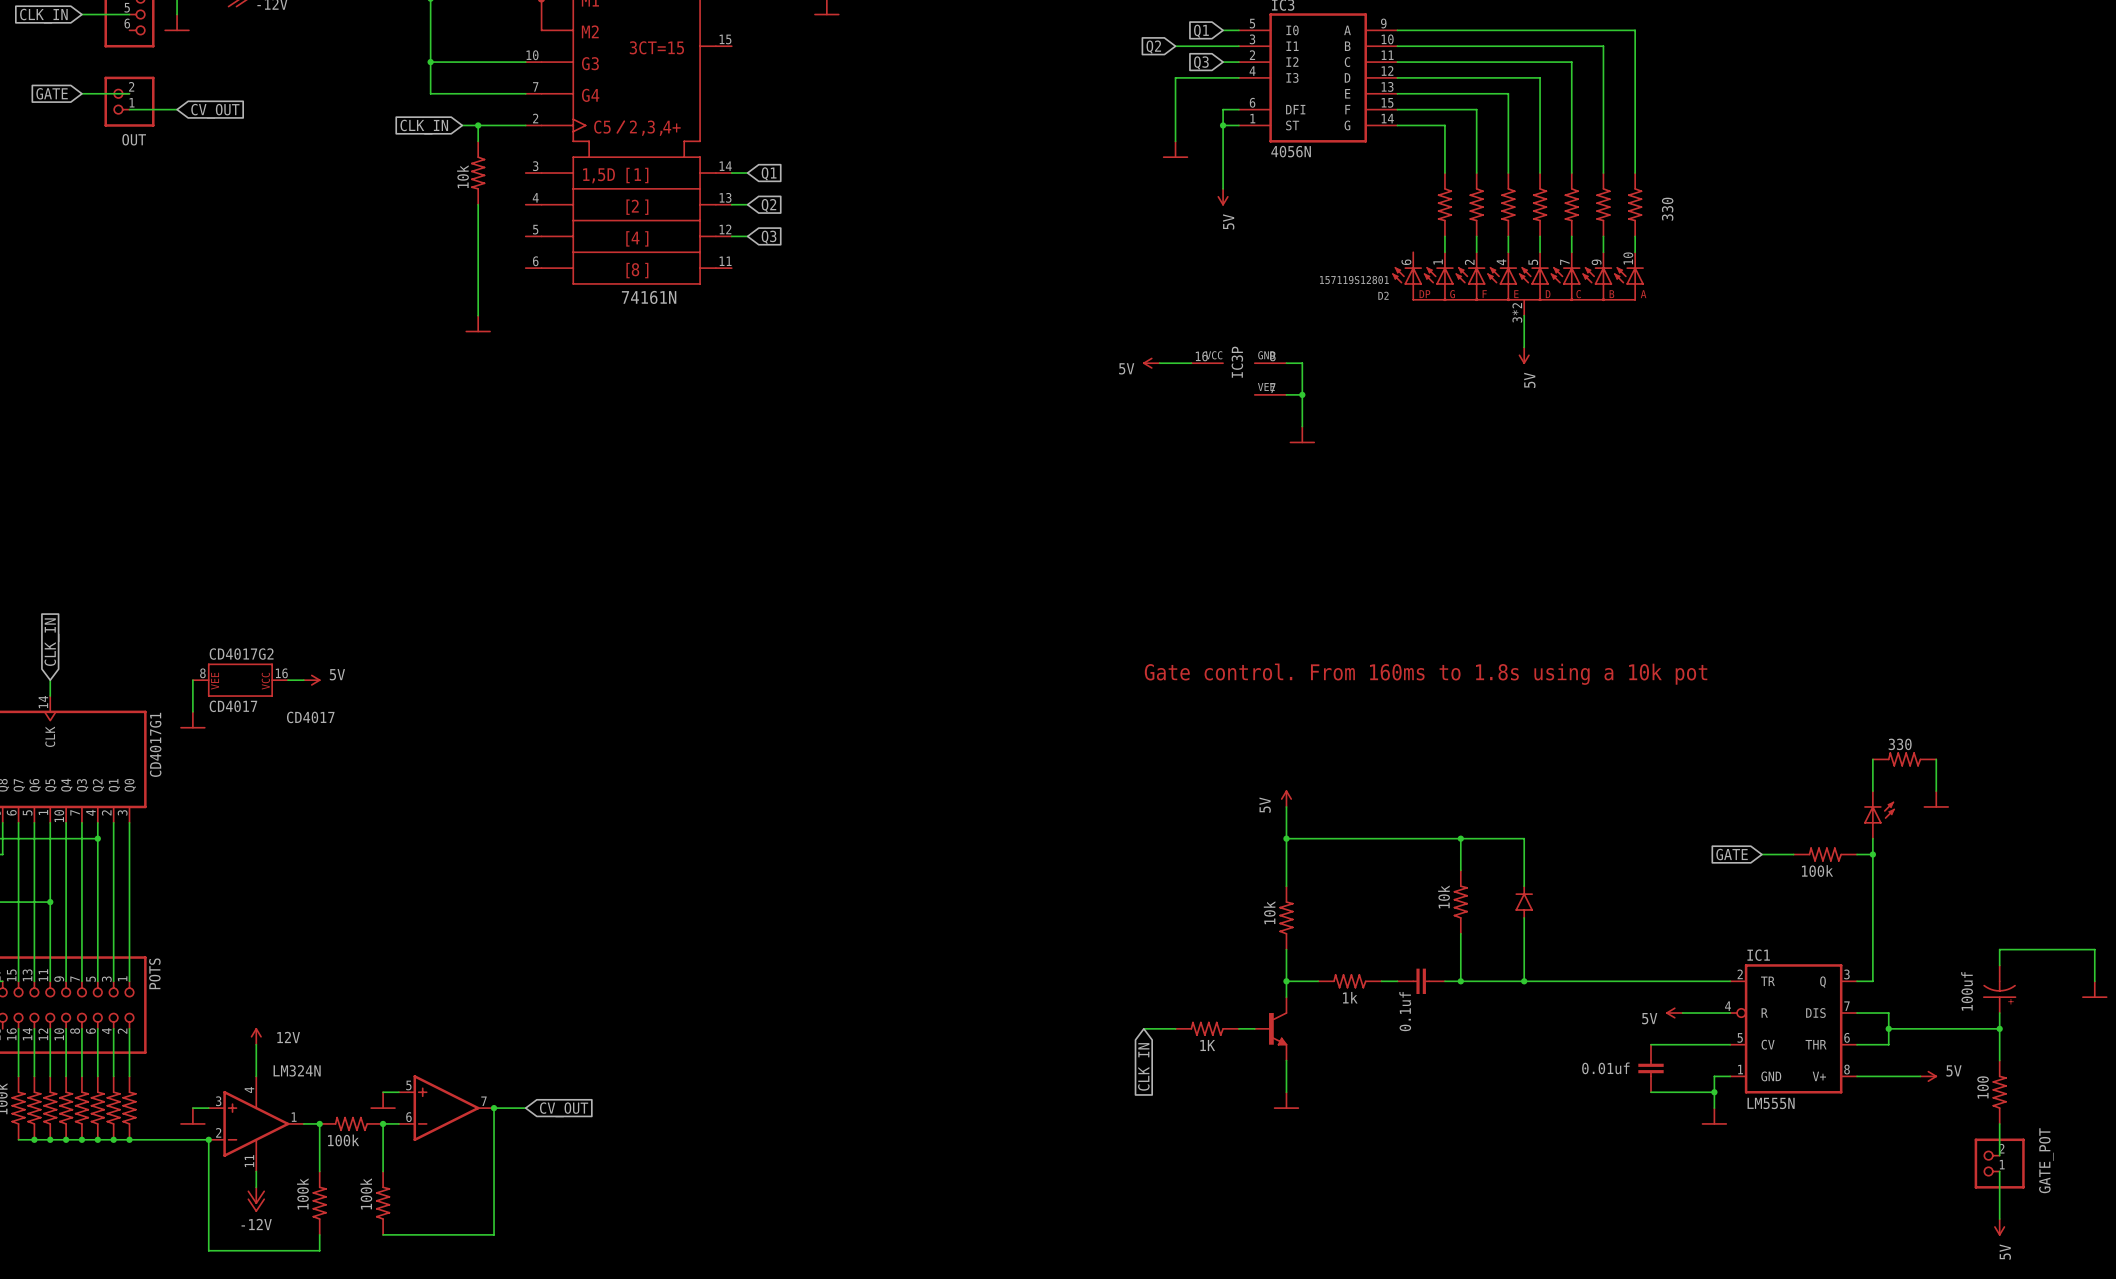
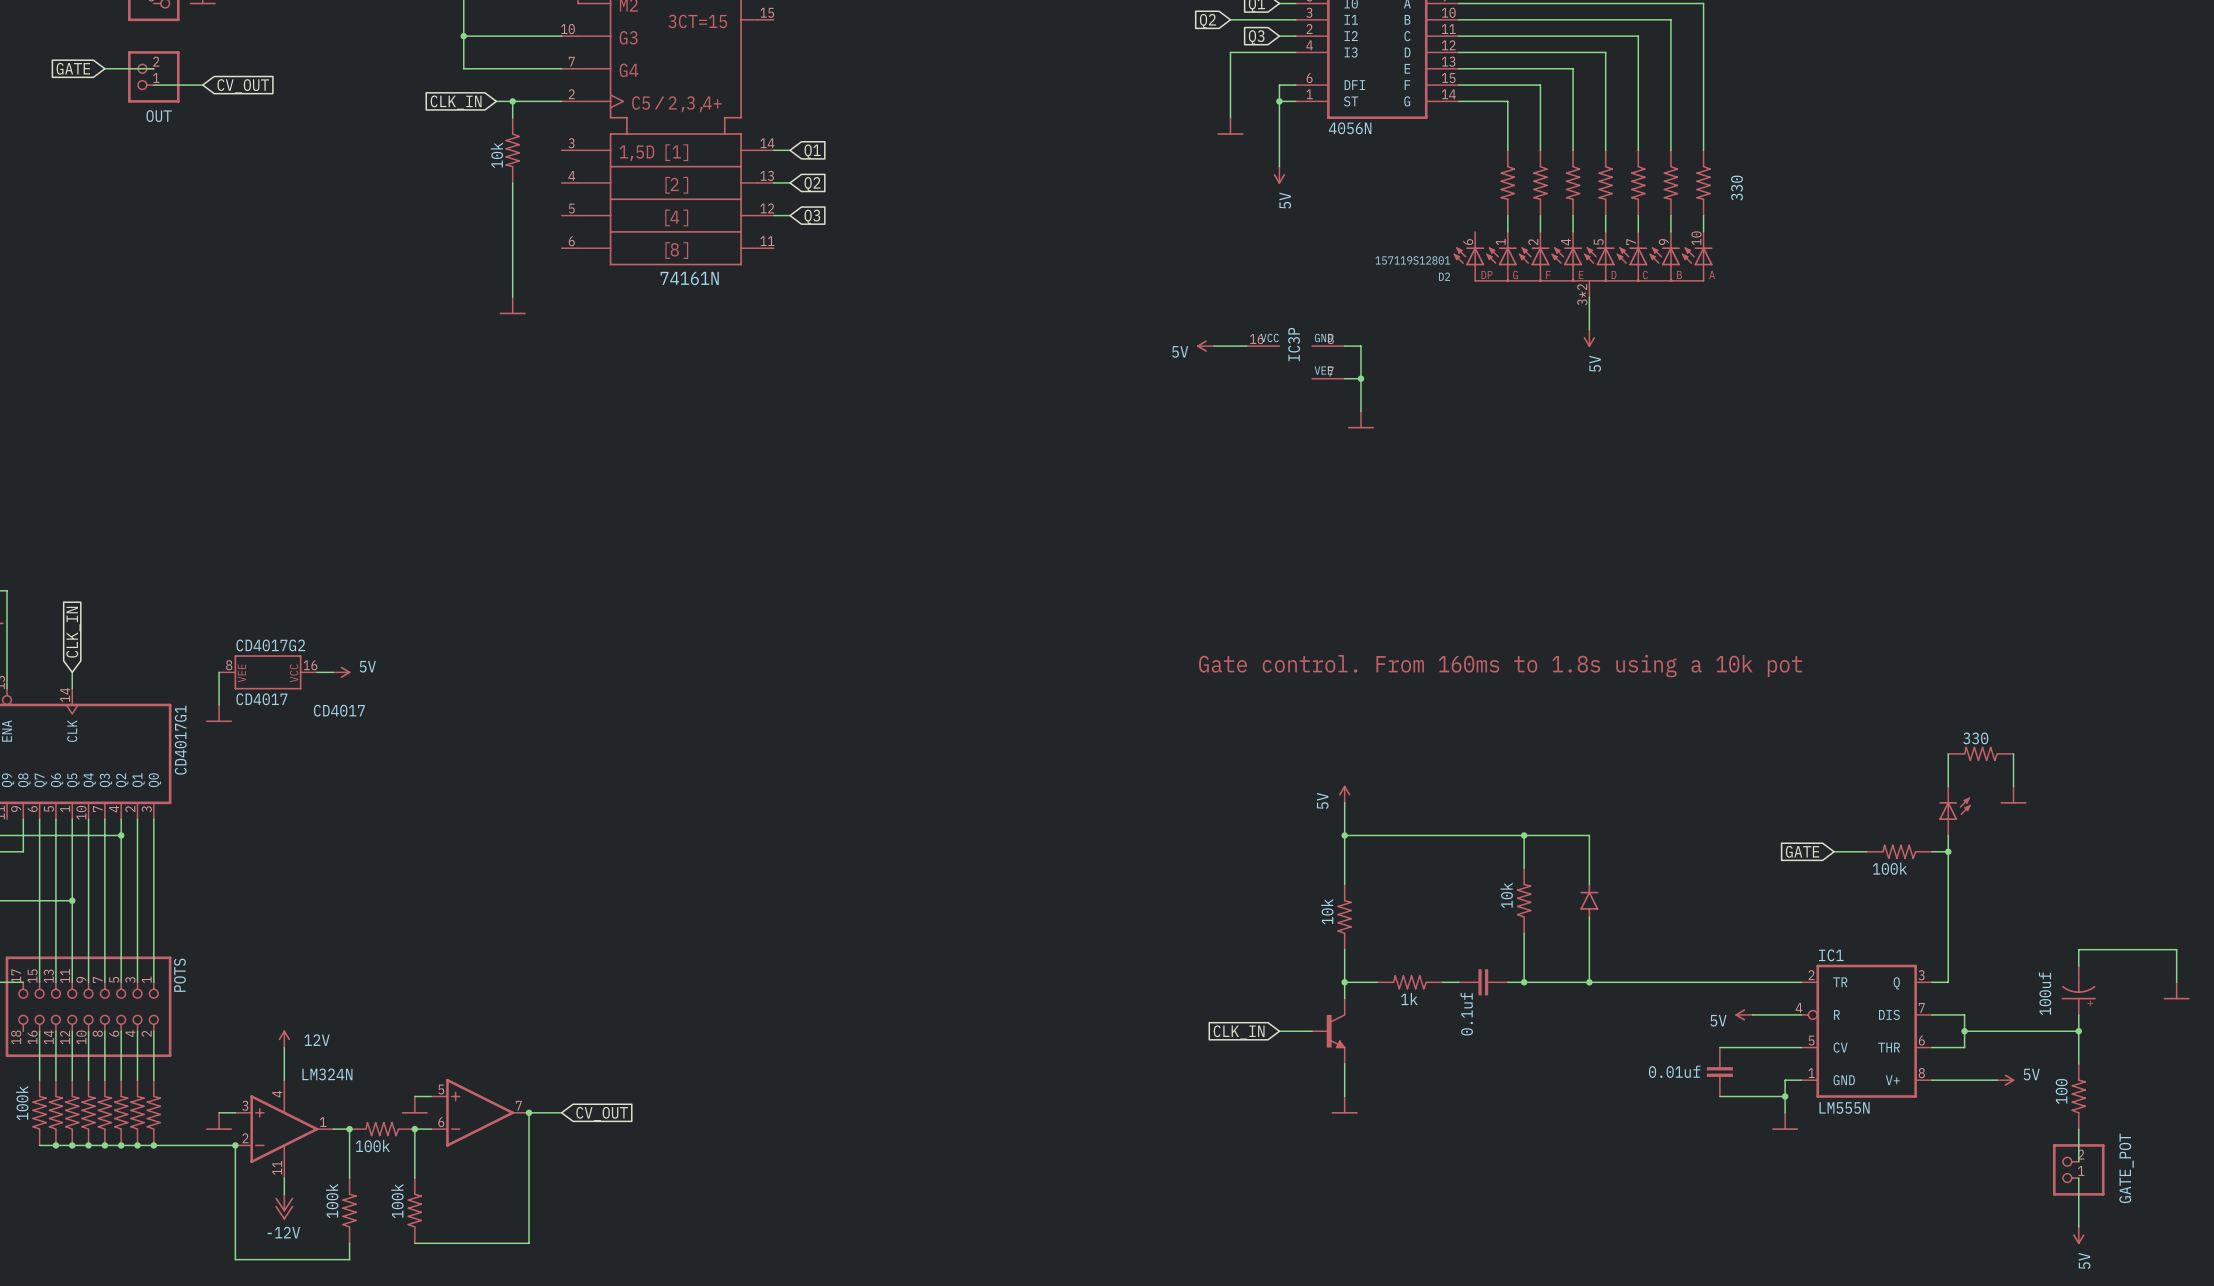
wire: (1143, 1028) (1175, 1028) -> none
part: 1K (1207, 1028) -> none
global label rotation: 0° (1145, 1066) -> 90° clockwise (1239, 1032)

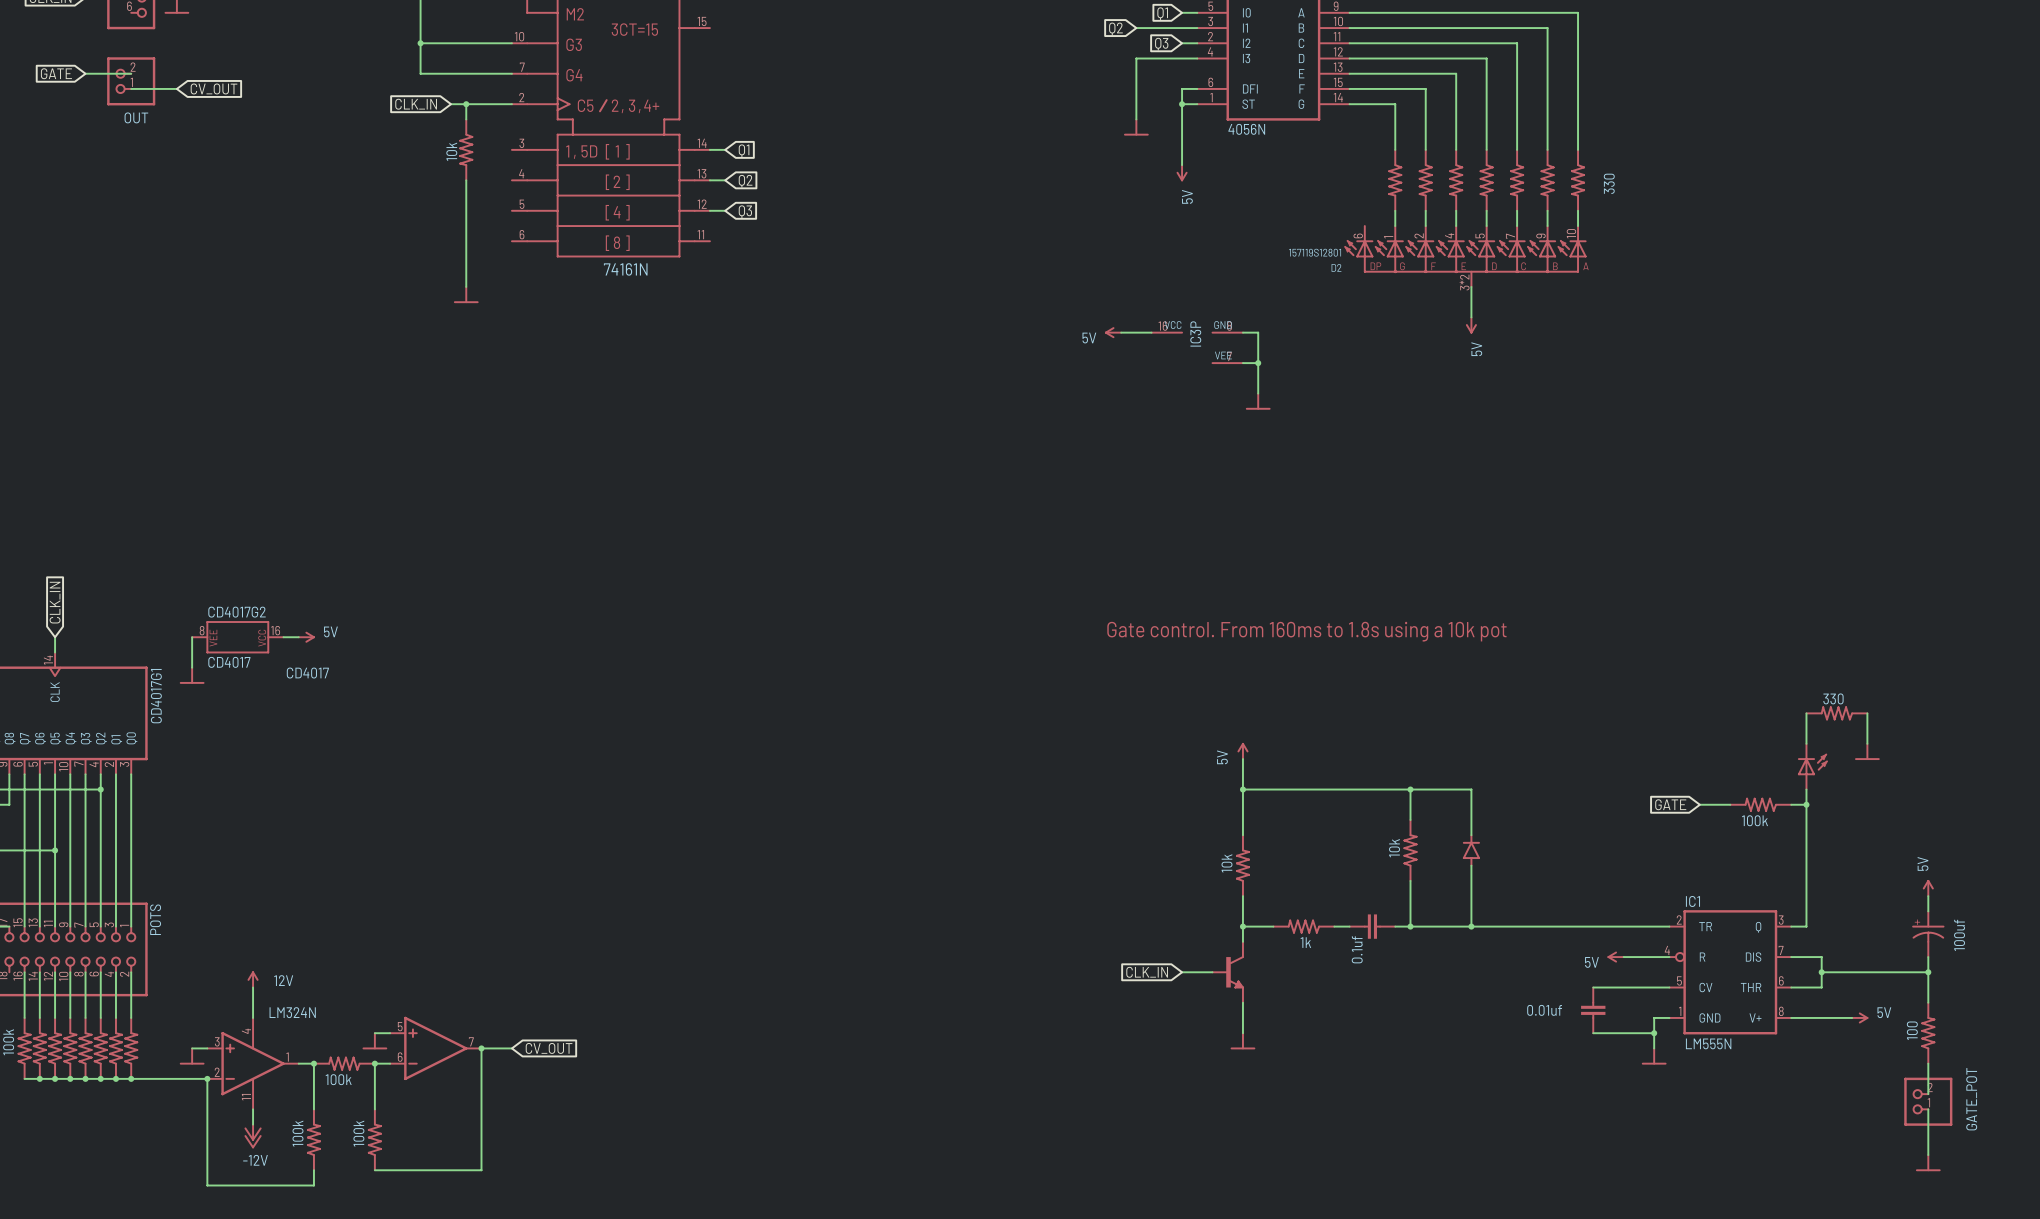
power symbol: none -> 5V (1928, 888)
wire: (2078, 949) (2176, 949) (2176, 982) -> none
power symbol: (2176, 990) -> none
part rotation: 0° (2078, 993) -> 180° (1928, 930)
power symbol shape: [2073, 1227, 2085, 1245] -> [1916, 1155, 1941, 1172]
power symbol text: 5V (2084, 1260) -> none

